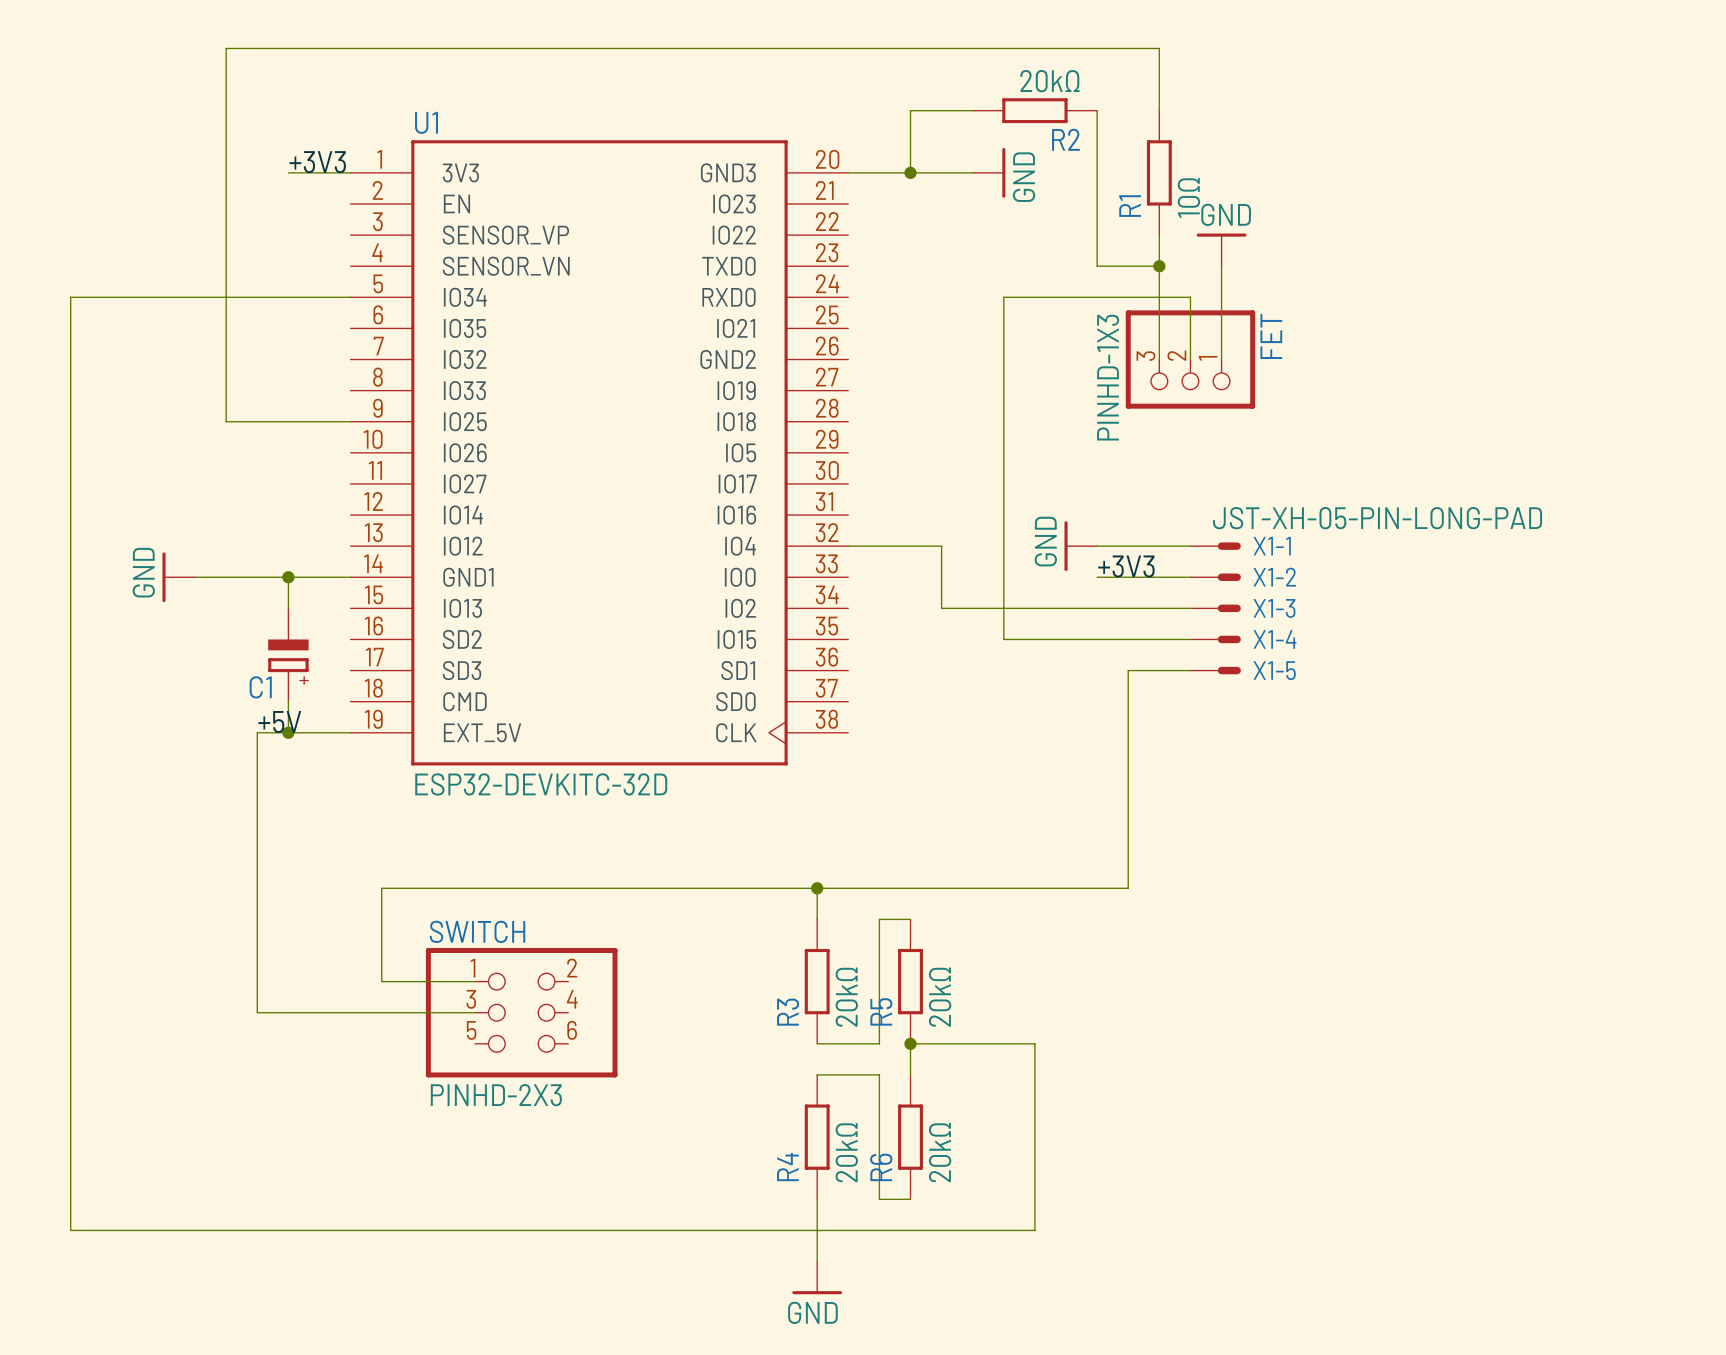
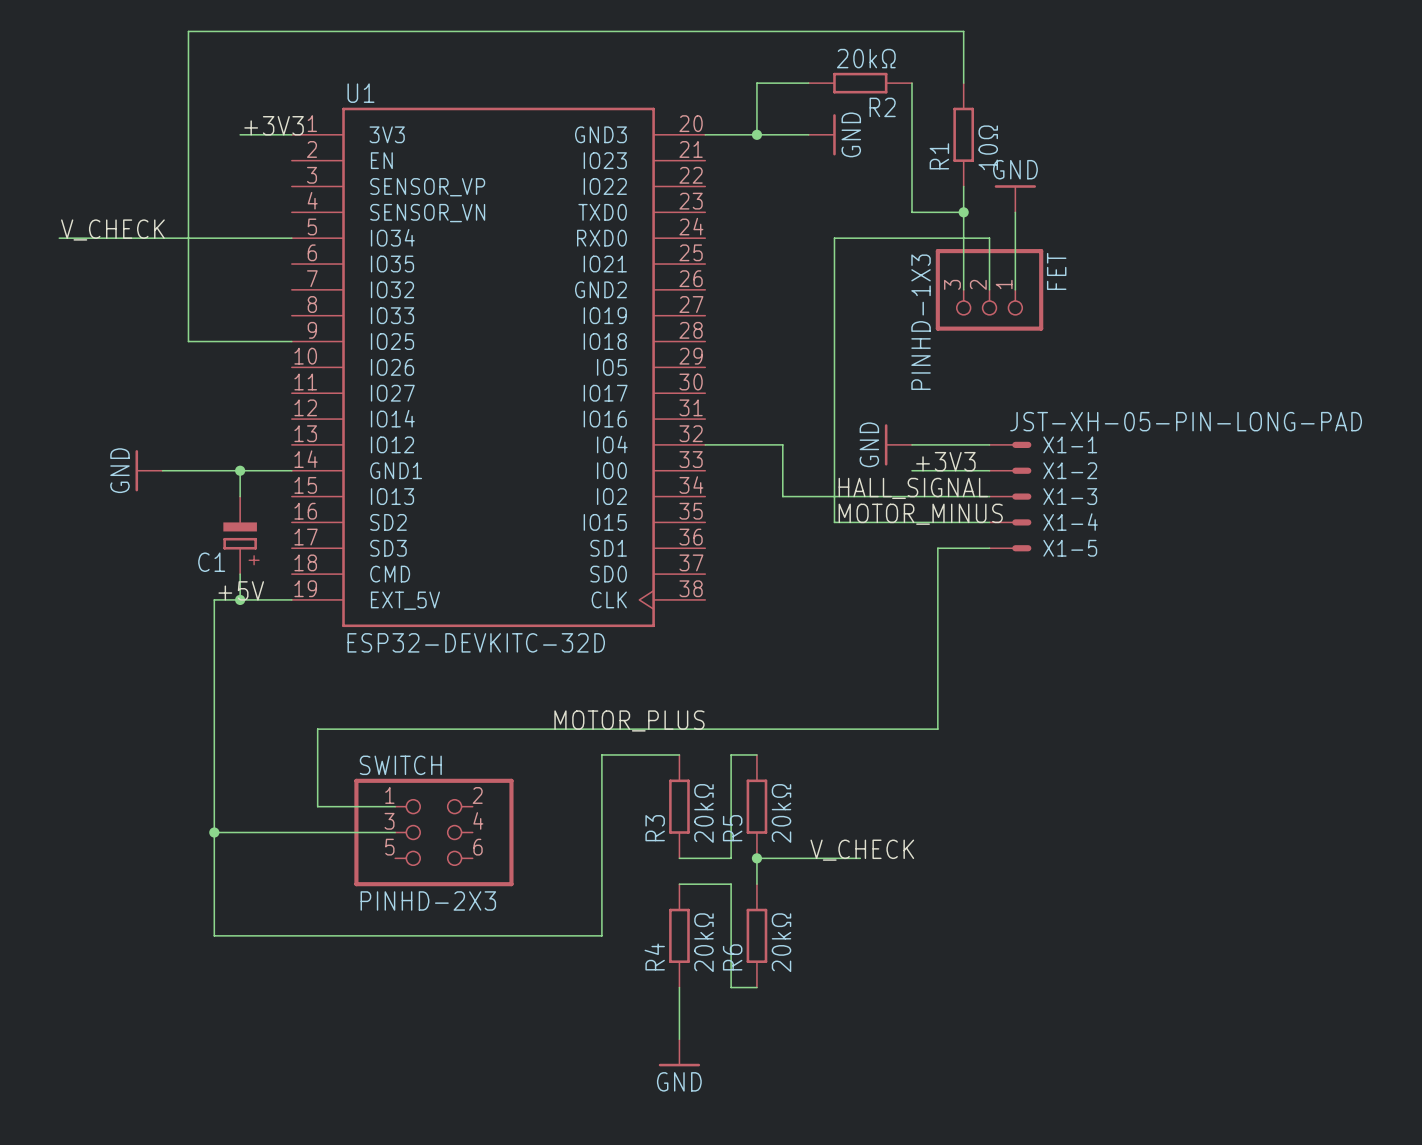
label: none -> V_CHECK (112, 229)
wire: (70, 297) (70, 1230) (1034, 1230) (1034, 1043) -> none
label: none -> HALL_SIGNAL (913, 488)
label: none -> MOTOR_MINUS (920, 514)
label: none -> MOTOR_PLUS (629, 720)
wire: (817, 888) (817, 919) -> (214, 832) (214, 935) (601, 935) (601, 754) (679, 754)
junction: (817, 888) -> none
junction: none -> (214, 832)
label: none -> V_CHECK (862, 850)

